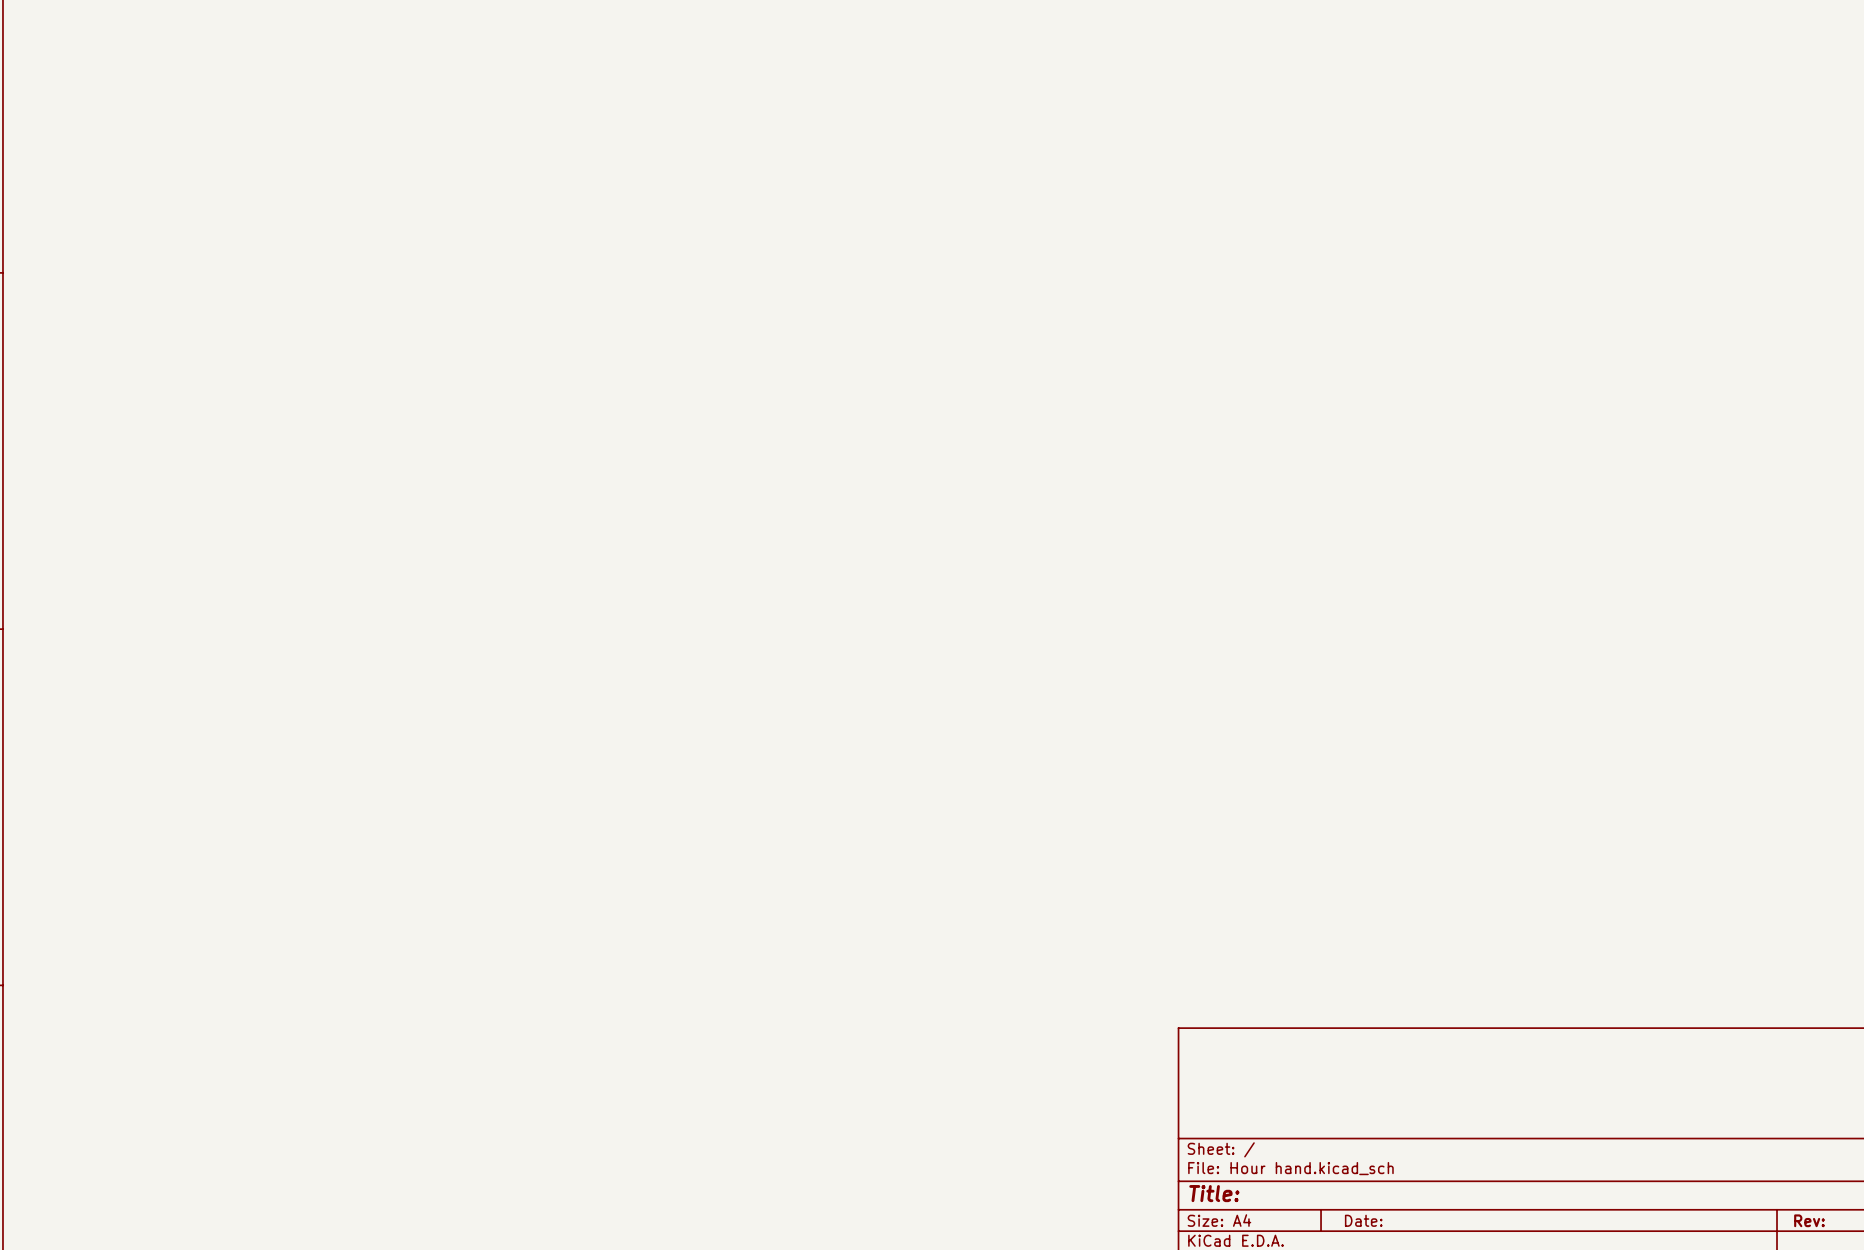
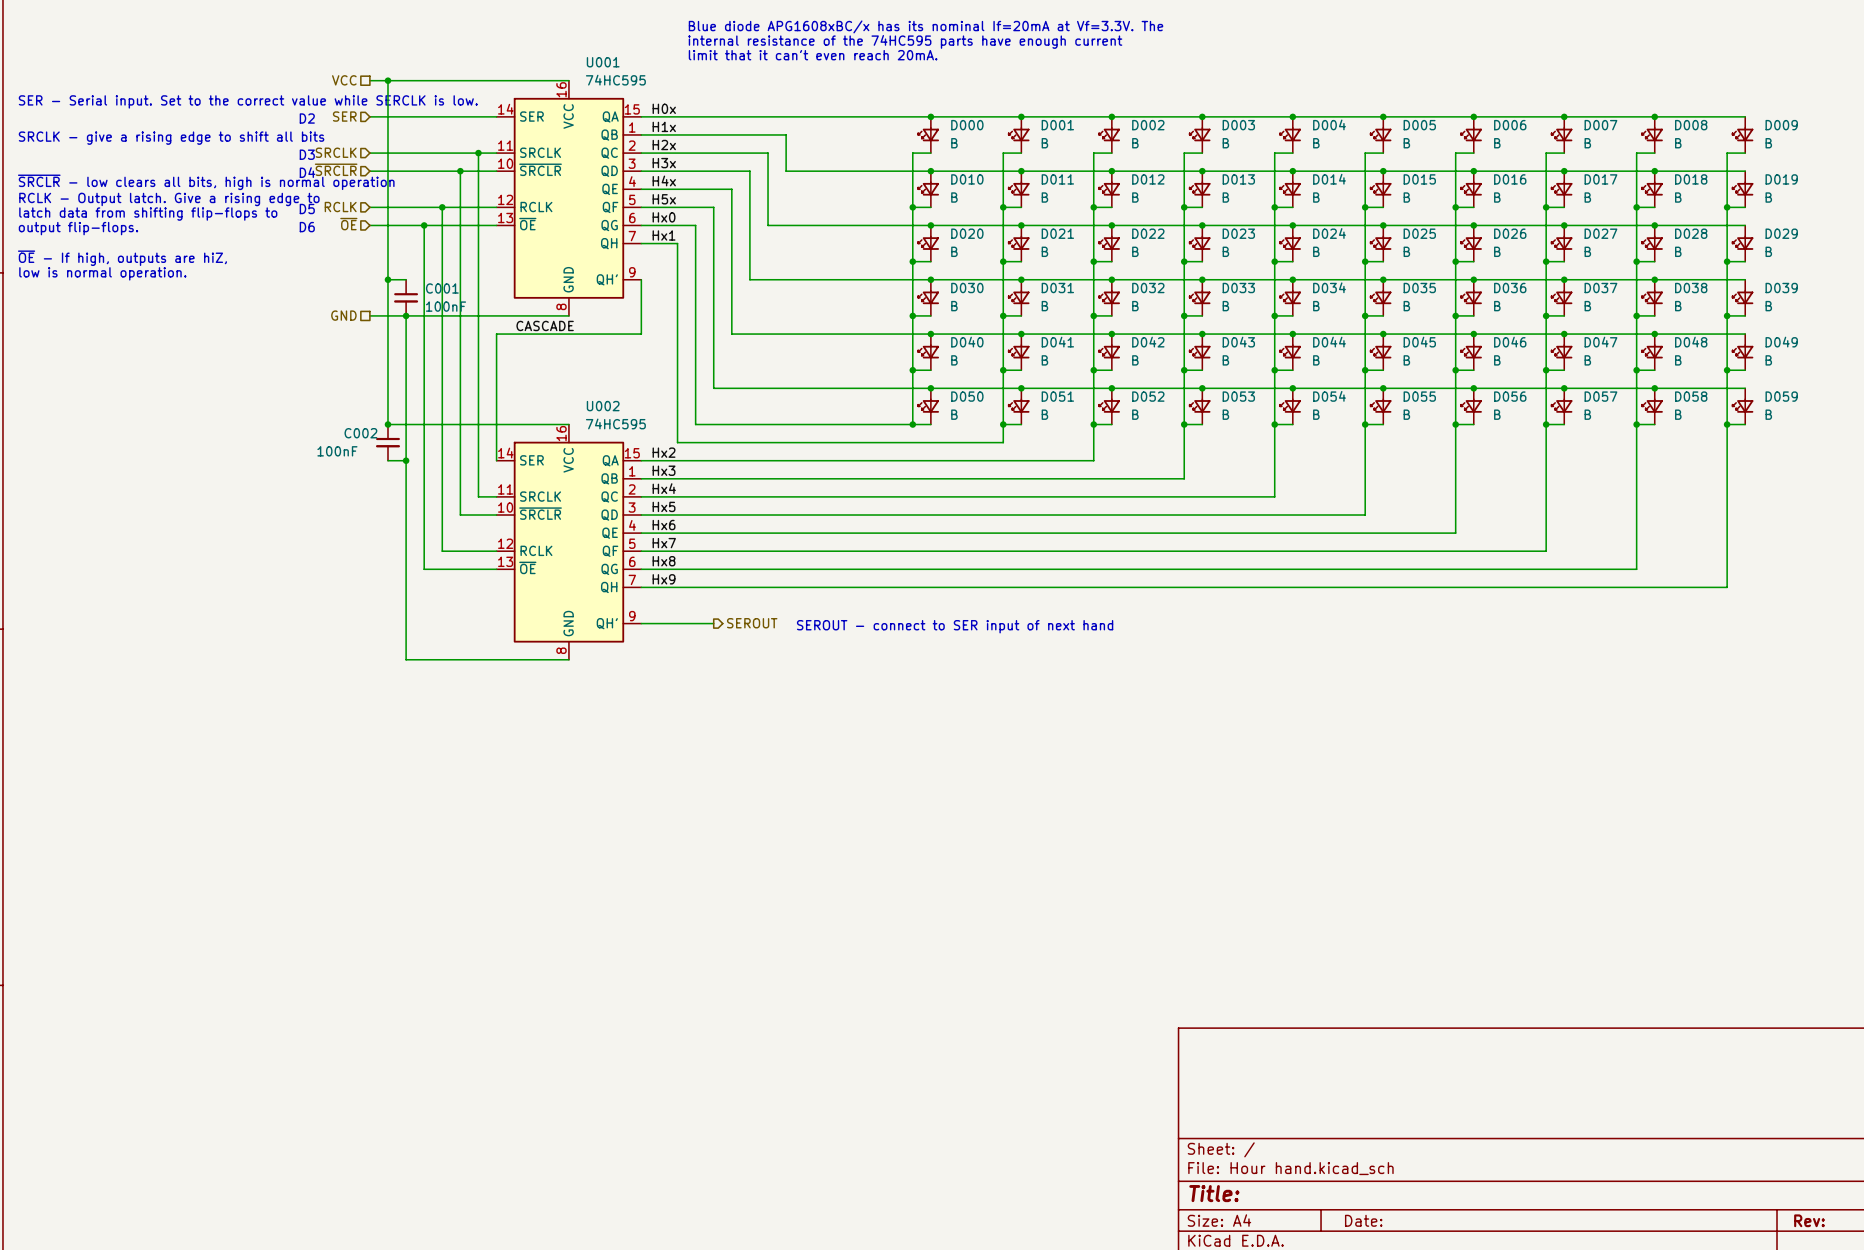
text: none -> Blue diode APG1608xBC/x has its nominal If=20mA at Vf=3.3V. The (926, 26)
text: none -> internal resistance of the 74HC595 parts have enough current (905, 41)
text: none -> limit that it can't even reach 20mA. (813, 55)
hierarchical label: none -> VCC (344, 80)
wire: none -> (369, 80) (568, 80)
wire: none -> (387, 80) (387, 424) (568, 424)
junction: none -> (387, 80)
text: none -> SER - Serial input. Set to the correct value while SERCLK is low. (248, 101)
label: none -> H0x (664, 108)
hierarchical label: none -> SER (344, 116)
wire: none -> (369, 116) (496, 116)
wire: none -> (641, 116) (1745, 116)
junction: none -> (930, 116)
junction: none -> (1021, 116)
junction: none -> (1111, 116)
junction: none -> (1202, 116)
junction: none -> (1292, 116)
junction: none -> (1383, 116)
junction: none -> (1473, 116)
junction: none -> (1564, 116)
junction: none -> (1654, 116)
text: none -> D2 (307, 118)
label: none -> H1x (664, 126)
wire: none -> (641, 134) (786, 134) (786, 171) (1745, 171)
D000: none -> B (928, 134)
D001: none -> B (1019, 134)
D002: none -> B (1109, 134)
D003: none -> B (1200, 134)
D004: none -> B (1290, 134)
D005: none -> B (1381, 134)
D006: none -> B (1471, 134)
D007: none -> B (1562, 134)
D008: none -> B (1652, 134)
D009: none -> B (1742, 134)
text: none -> SRCLK - give a rising edge to shift all bits (171, 138)
label: none -> H2x (664, 145)
hierarchical label: none -> SRCLK (336, 152)
wire: none -> (369, 153) (496, 153)
wire: none -> (478, 153) (478, 496) (496, 496)
junction: none -> (478, 153)
wire: none -> (641, 153) (768, 153) (768, 225) (1745, 225)
wire: none -> (930, 153) (912, 153) (912, 424)
wire: none -> (1021, 153) (1003, 153) (1003, 442) (677, 442) (677, 243) (641, 243)
wire: none -> (1111, 153) (1093, 153) (1093, 460) (641, 460)
wire: none -> (1202, 153) (1184, 153) (1184, 478) (641, 478)
wire: none -> (1292, 153) (1274, 153) (1274, 496) (641, 496)
wire: none -> (1383, 153) (1365, 153) (1365, 515) (641, 515)
wire: none -> (1473, 153) (1455, 153) (1455, 533) (641, 533)
wire: none -> (1564, 153) (1546, 153) (1546, 551) (641, 551)
wire: none -> (1654, 153) (1636, 153) (1636, 569) (641, 569)
wire: none -> (1745, 153) (1727, 153) (1727, 587) (641, 587)
text: none -> D3 (307, 154)
label: none -> H3x (664, 163)
hierarchical label: none -> ~{SRCLR} (336, 169)
wire: none -> (369, 171) (496, 171)
wire: none -> (460, 171) (460, 515) (496, 515)
junction: none -> (460, 171)
wire: none -> (641, 171) (749, 171) (749, 279) (1745, 279)
junction: none -> (930, 171)
junction: none -> (1021, 171)
junction: none -> (1111, 171)
junction: none -> (1202, 171)
junction: none -> (1292, 171)
junction: none -> (1383, 171)
junction: none -> (1473, 171)
junction: none -> (1564, 171)
junction: none -> (1654, 171)
text: none -> D4 (307, 172)
label: none -> H4x (664, 180)
text: none -> ~{SRCLR} - low clears all bits, high is normal operation (206, 182)
wire: none -> (641, 189) (731, 189) (731, 334) (1745, 334)
D010: none -> B (928, 189)
D011: none -> B (1019, 189)
D012: none -> B (1109, 189)
D013: none -> B (1200, 189)
D014: none -> B (1290, 189)
D015: none -> B (1381, 189)
D016: none -> B (1471, 189)
D017: none -> B (1562, 189)
D018: none -> B (1652, 189)
D019: none -> B (1742, 189)
U001: none -> 74HC595 (568, 198)
text: none -> RCLK - Output latch. Give a rising edge to (169, 199)
label: none -> H5x (664, 199)
hierarchical label: none -> RCLK (340, 207)
wire: none -> (369, 207) (496, 207)
wire: none -> (442, 207) (442, 551) (496, 551)
junction: none -> (442, 207)
wire: none -> (641, 207) (713, 207) (713, 388) (1745, 388)
wire: none -> (912, 207) (930, 207)
junction: none -> (912, 207)
wire: none -> (1003, 207) (1021, 207)
junction: none -> (1003, 207)
wire: none -> (1093, 207) (1111, 207)
junction: none -> (1093, 207)
wire: none -> (1184, 207) (1202, 207)
junction: none -> (1184, 207)
wire: none -> (1274, 207) (1292, 207)
junction: none -> (1274, 207)
wire: none -> (1365, 207) (1383, 207)
junction: none -> (1365, 207)
wire: none -> (1455, 207) (1473, 207)
junction: none -> (1455, 207)
wire: none -> (1546, 207) (1564, 207)
junction: none -> (1546, 207)
wire: none -> (1636, 207) (1654, 207)
junction: none -> (1636, 207)
wire: none -> (1727, 207) (1745, 207)
junction: none -> (1727, 207)
text: none -> D5 (307, 209)
text: none -> latch data from shifting flip-flops to (148, 214)
label: none -> Hx0 (664, 217)
hierarchical label: none -> ~{OE} (348, 224)
wire: none -> (369, 225) (496, 225)
wire: none -> (424, 225) (424, 569) (496, 569)
junction: none -> (424, 225)
wire: none -> (641, 225) (695, 225) (695, 424) (930, 424)
junction: none -> (930, 225)
junction: none -> (1021, 225)
junction: none -> (1111, 225)
junction: none -> (1202, 225)
junction: none -> (1292, 225)
junction: none -> (1383, 225)
junction: none -> (1473, 225)
junction: none -> (1564, 225)
junction: none -> (1654, 225)
text: none -> D6 (307, 227)
text: none -> output flip-flops. (78, 228)
label: none -> Hx1 (664, 235)
D020: none -> B (928, 243)
D021: none -> B (1019, 243)
D022: none -> B (1109, 243)
D023: none -> B (1200, 243)
D024: none -> B (1290, 243)
D025: none -> B (1381, 243)
D026: none -> B (1471, 243)
D027: none -> B (1562, 243)
D028: none -> B (1652, 243)
D029: none -> B (1742, 243)
text: none -> ~{OE} - If high, outputs are hiZ, (122, 258)
wire: none -> (912, 261) (930, 261)
junction: none -> (912, 261)
wire: none -> (1003, 261) (1021, 261)
junction: none -> (1003, 261)
wire: none -> (1093, 261) (1111, 261)
junction: none -> (1093, 261)
wire: none -> (1184, 261) (1202, 261)
junction: none -> (1184, 261)
wire: none -> (1274, 261) (1292, 261)
junction: none -> (1274, 261)
wire: none -> (1365, 261) (1383, 261)
junction: none -> (1365, 261)
wire: none -> (1455, 261) (1473, 261)
junction: none -> (1455, 261)
wire: none -> (1546, 261) (1564, 261)
junction: none -> (1546, 261)
wire: none -> (1636, 261) (1654, 261)
junction: none -> (1636, 261)
wire: none -> (1727, 261) (1745, 261)
junction: none -> (1727, 261)
text: none -> low is normal operation. (102, 273)
wire: none -> (387, 279) (406, 279)
junction: none -> (387, 279)
wire: none -> (641, 279) (641, 334) (496, 334) (496, 460)
junction: none -> (930, 279)
junction: none -> (1021, 279)
junction: none -> (1111, 279)
junction: none -> (1202, 279)
junction: none -> (1292, 279)
junction: none -> (1383, 279)
junction: none -> (1473, 279)
junction: none -> (1564, 279)
junction: none -> (1654, 279)
C001: none -> 100nF (406, 297)
D030: none -> B (928, 297)
D031: none -> B (1019, 297)
D032: none -> B (1109, 297)
D033: none -> B (1200, 297)
D034: none -> B (1290, 297)
D035: none -> B (1381, 297)
D036: none -> B (1471, 297)
D037: none -> B (1562, 297)
D038: none -> B (1652, 297)
D039: none -> B (1742, 297)
hierarchical label: none -> GND (343, 315)
wire: none -> (369, 315) (568, 315)
wire: none -> (406, 315) (406, 659) (568, 659)
junction: none -> (406, 315)
wire: none -> (912, 315) (930, 315)
junction: none -> (912, 315)
wire: none -> (1003, 315) (1021, 315)
junction: none -> (1003, 315)
wire: none -> (1093, 315) (1111, 315)
junction: none -> (1093, 315)
wire: none -> (1184, 315) (1202, 315)
junction: none -> (1184, 315)
wire: none -> (1274, 315) (1292, 315)
junction: none -> (1274, 315)
wire: none -> (1365, 315) (1383, 315)
junction: none -> (1365, 315)
wire: none -> (1455, 315) (1473, 315)
junction: none -> (1455, 315)
wire: none -> (1546, 315) (1564, 315)
junction: none -> (1546, 315)
wire: none -> (1636, 315) (1654, 315)
junction: none -> (1636, 315)
wire: none -> (1727, 315) (1745, 315)
junction: none -> (1727, 315)
label: none -> CASCADE (545, 325)
junction: none -> (930, 334)
junction: none -> (1021, 334)
junction: none -> (1111, 334)
junction: none -> (1202, 334)
junction: none -> (1292, 334)
junction: none -> (1383, 334)
junction: none -> (1473, 334)
junction: none -> (1564, 334)
junction: none -> (1654, 334)
D040: none -> B (928, 352)
D041: none -> B (1019, 352)
D042: none -> B (1109, 352)
D043: none -> B (1200, 352)
D044: none -> B (1290, 352)
D045: none -> B (1381, 352)
D046: none -> B (1471, 352)
D047: none -> B (1562, 352)
D048: none -> B (1652, 352)
D049: none -> B (1742, 352)
wire: none -> (912, 370) (930, 370)
junction: none -> (912, 370)
wire: none -> (1003, 370) (1021, 370)
junction: none -> (1003, 370)
wire: none -> (1093, 370) (1111, 370)
junction: none -> (1093, 370)
wire: none -> (1184, 370) (1202, 370)
junction: none -> (1184, 370)
wire: none -> (1274, 370) (1292, 370)
junction: none -> (1274, 370)
wire: none -> (1365, 370) (1383, 370)
junction: none -> (1365, 370)
wire: none -> (1455, 370) (1473, 370)
junction: none -> (1455, 370)
wire: none -> (1546, 370) (1564, 370)
junction: none -> (1546, 370)
wire: none -> (1636, 370) (1654, 370)
junction: none -> (1636, 370)
wire: none -> (1727, 370) (1745, 370)
junction: none -> (1727, 370)
junction: none -> (930, 388)
junction: none -> (1021, 388)
junction: none -> (1111, 388)
junction: none -> (1202, 388)
junction: none -> (1292, 388)
junction: none -> (1383, 388)
junction: none -> (1473, 388)
junction: none -> (1564, 388)
junction: none -> (1654, 388)
D050: none -> B (928, 406)
D051: none -> B (1019, 406)
D052: none -> B (1109, 406)
D053: none -> B (1200, 406)
D054: none -> B (1290, 406)
D055: none -> B (1381, 406)
D056: none -> B (1471, 406)
D057: none -> B (1562, 406)
D058: none -> B (1652, 406)
D059: none -> B (1742, 406)
junction: none -> (387, 424)
junction: none -> (912, 424)
wire: none -> (1003, 424) (1021, 424)
junction: none -> (1003, 424)
wire: none -> (1093, 424) (1111, 424)
junction: none -> (1093, 424)
wire: none -> (1184, 424) (1202, 424)
junction: none -> (1184, 424)
wire: none -> (1274, 424) (1292, 424)
junction: none -> (1274, 424)
wire: none -> (1365, 424) (1383, 424)
junction: none -> (1365, 424)
wire: none -> (1455, 424) (1473, 424)
junction: none -> (1455, 424)
wire: none -> (1546, 424) (1564, 424)
junction: none -> (1546, 424)
wire: none -> (1636, 424) (1654, 424)
junction: none -> (1636, 424)
wire: none -> (1727, 424) (1745, 424)
junction: none -> (1727, 424)
C002: none -> 100nF (387, 442)
label: none -> Hx2 (664, 452)
wire: none -> (387, 460) (406, 460)
junction: none -> (406, 460)
label: none -> Hx3 (664, 470)
label: none -> Hx4 (664, 488)
label: none -> Hx5 (664, 506)
label: none -> Hx6 (664, 525)
U002: none -> 74HC595 (568, 542)
label: none -> Hx7 (664, 543)
label: none -> Hx8 (664, 561)
label: none -> Hx9 (664, 579)
wire: none -> (641, 623) (713, 623)
hierarchical label: none -> SEROUT (752, 623)
text: none -> SEROUT - connect to SER input of next hand (955, 626)

